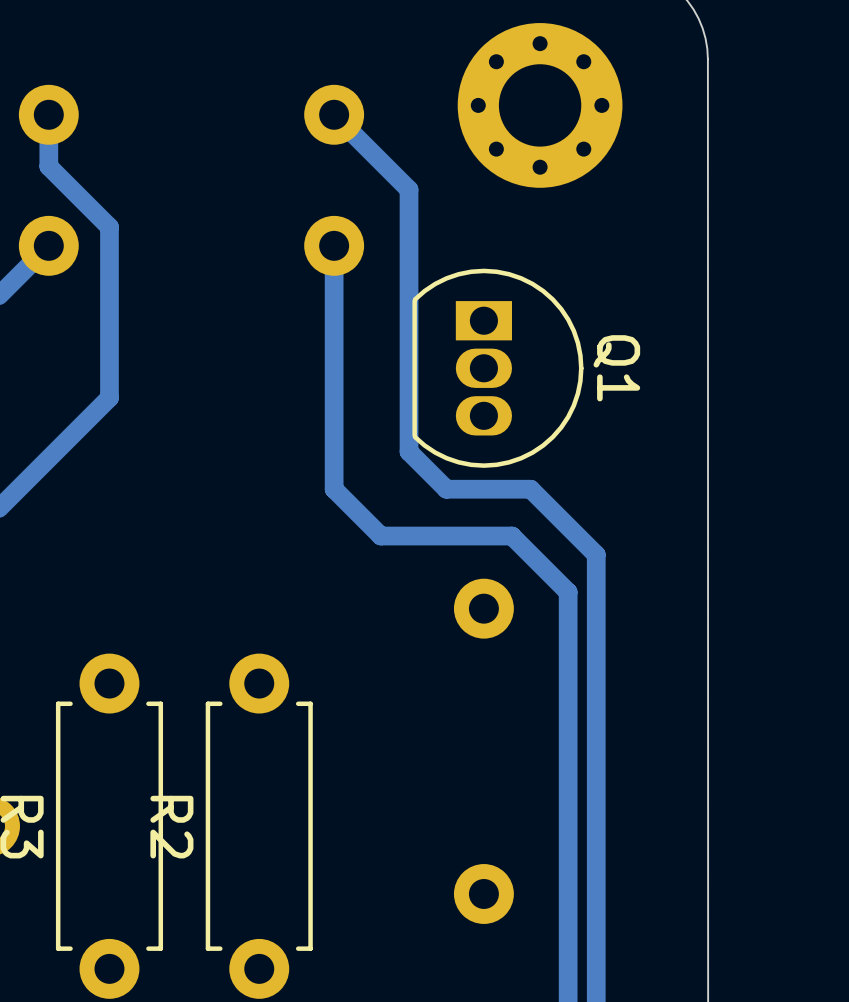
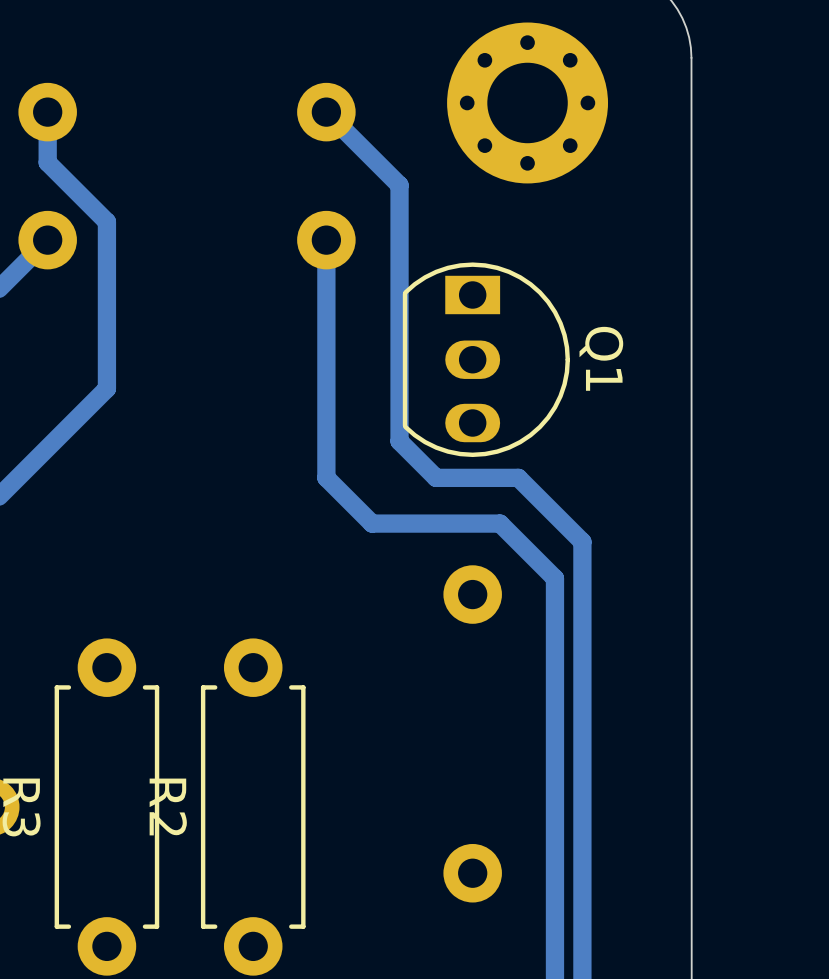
Q1 footprint: [412, 268, 584, 468] -> [402, 262, 570, 458]

